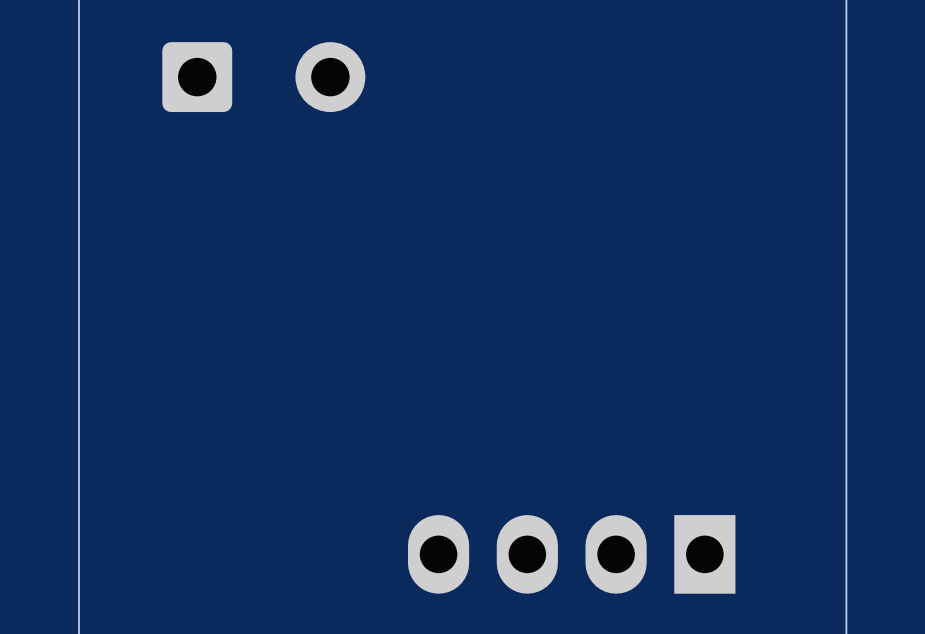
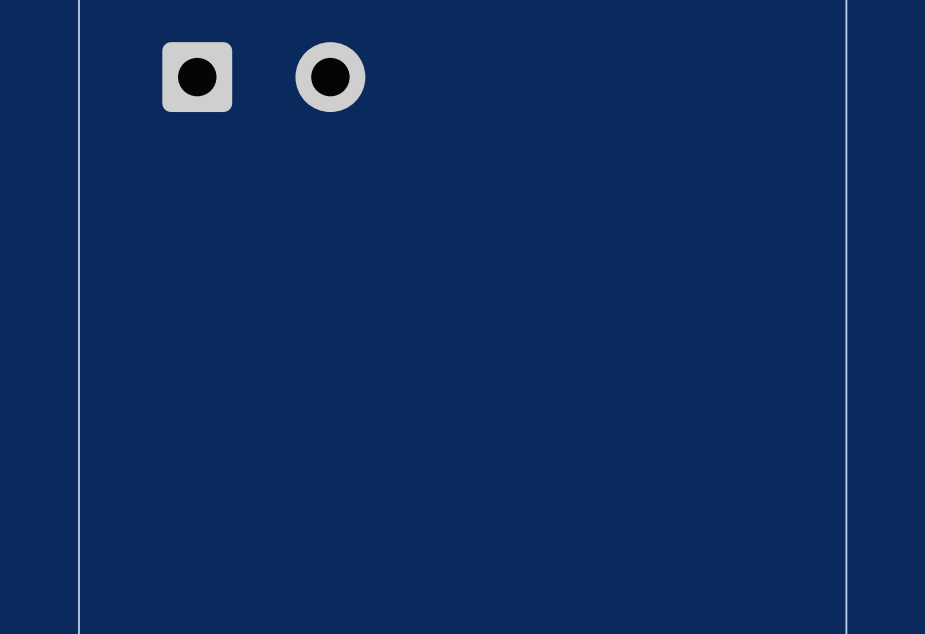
part: (571, 554) -> none

